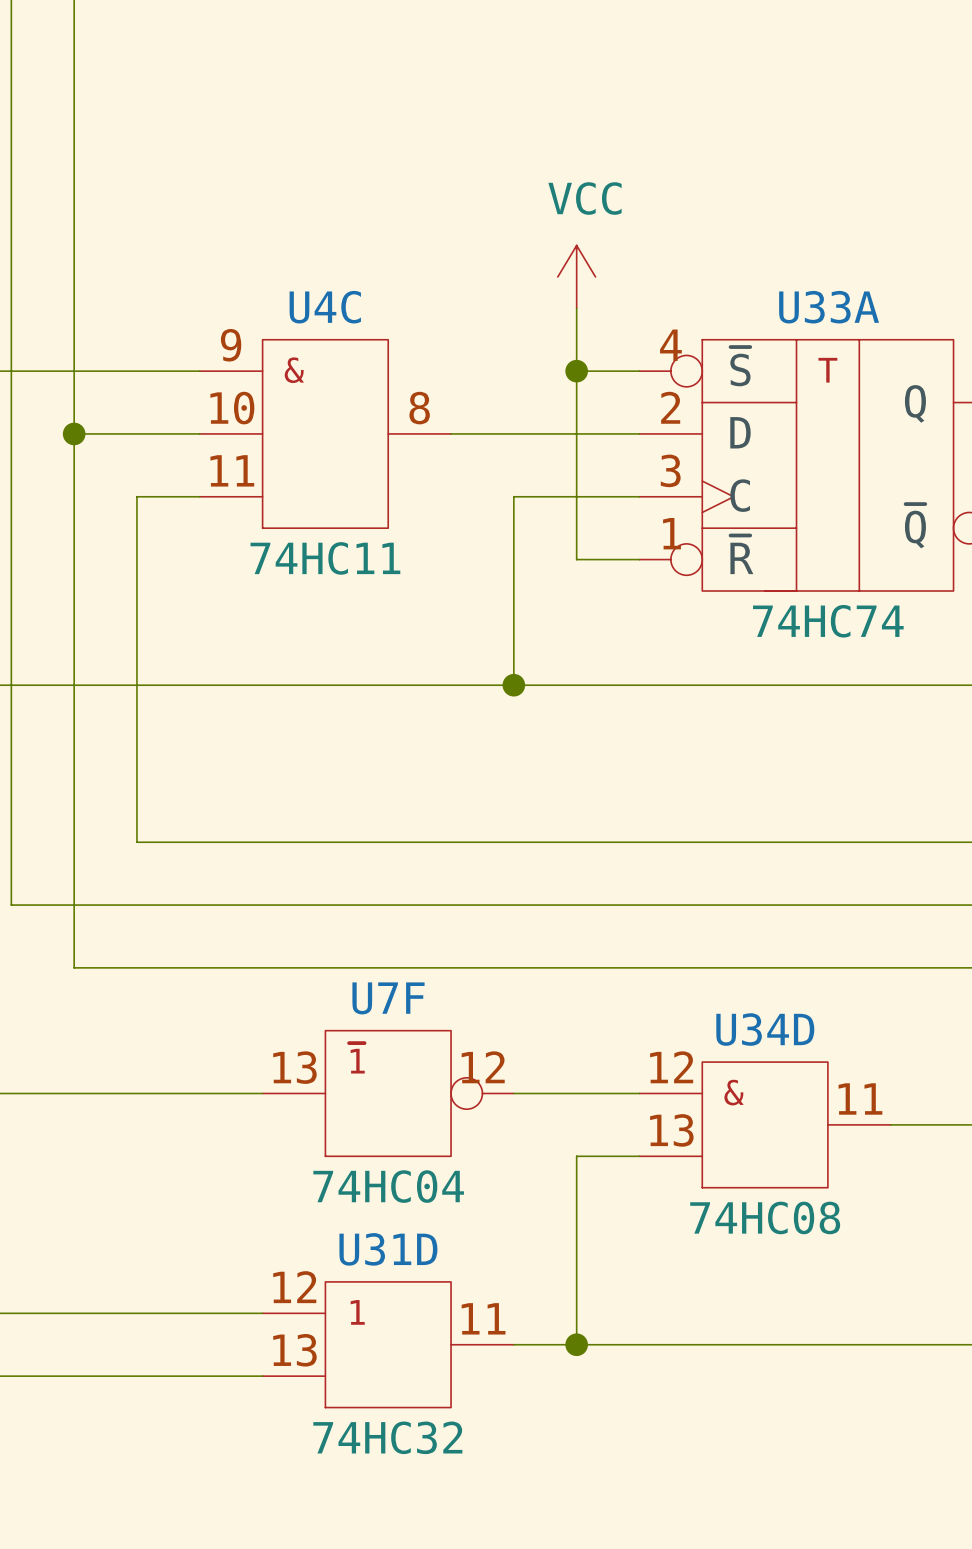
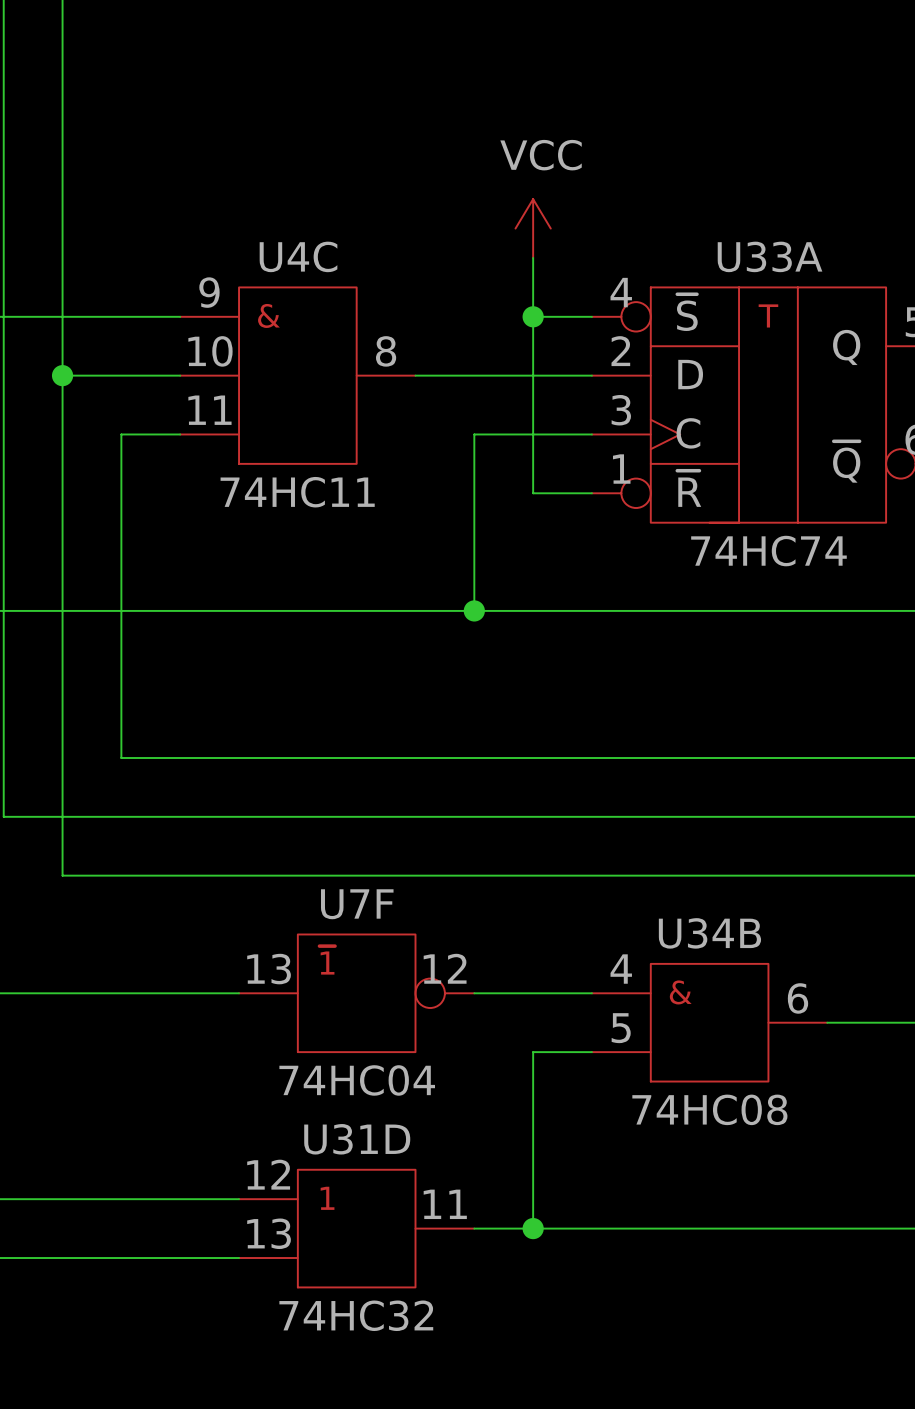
U34D name: U34D (765, 1029) -> U34B (709, 933)
U34D pin number: 12 (671, 1067) -> 4 (621, 969)
U34D pin number: 11 (860, 1098) -> 6 (798, 998)
U34D pin number: 13 (671, 1130) -> 5 (621, 1028)

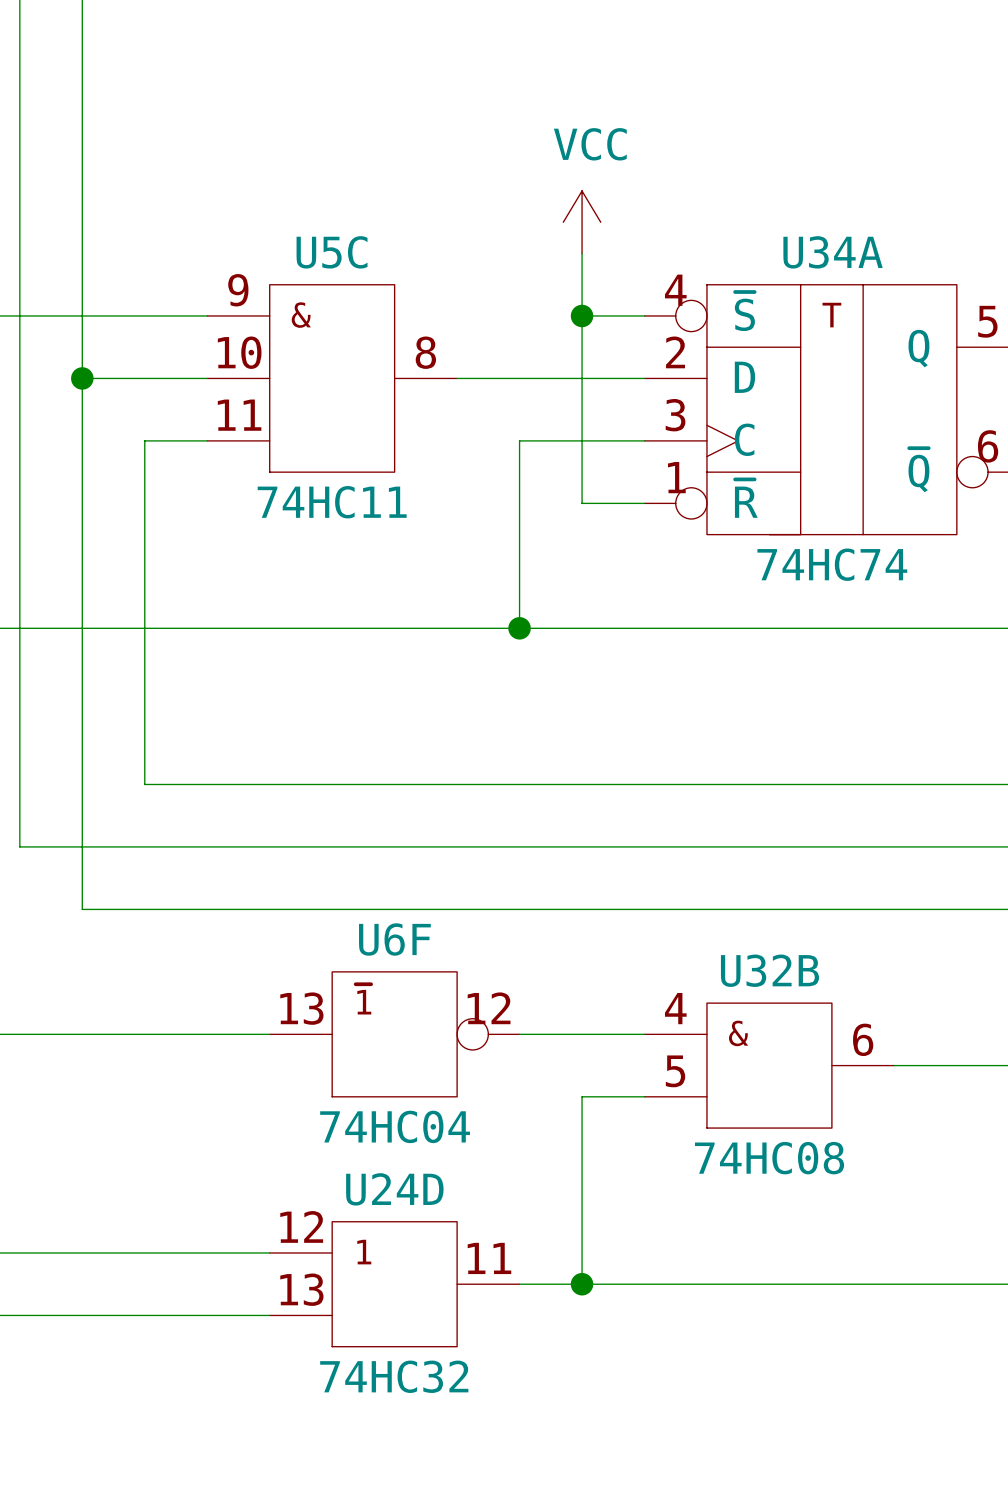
U4C name: U4C (298, 256) -> U5C (332, 252)
U33A name: U33A (770, 256) -> U34A (833, 252)
U7F name: U7F (357, 904) -> U6F (394, 939)
U34B name: U34B (709, 933) -> U32B (769, 970)
U31D name: U31D (357, 1139) -> U24D (394, 1189)

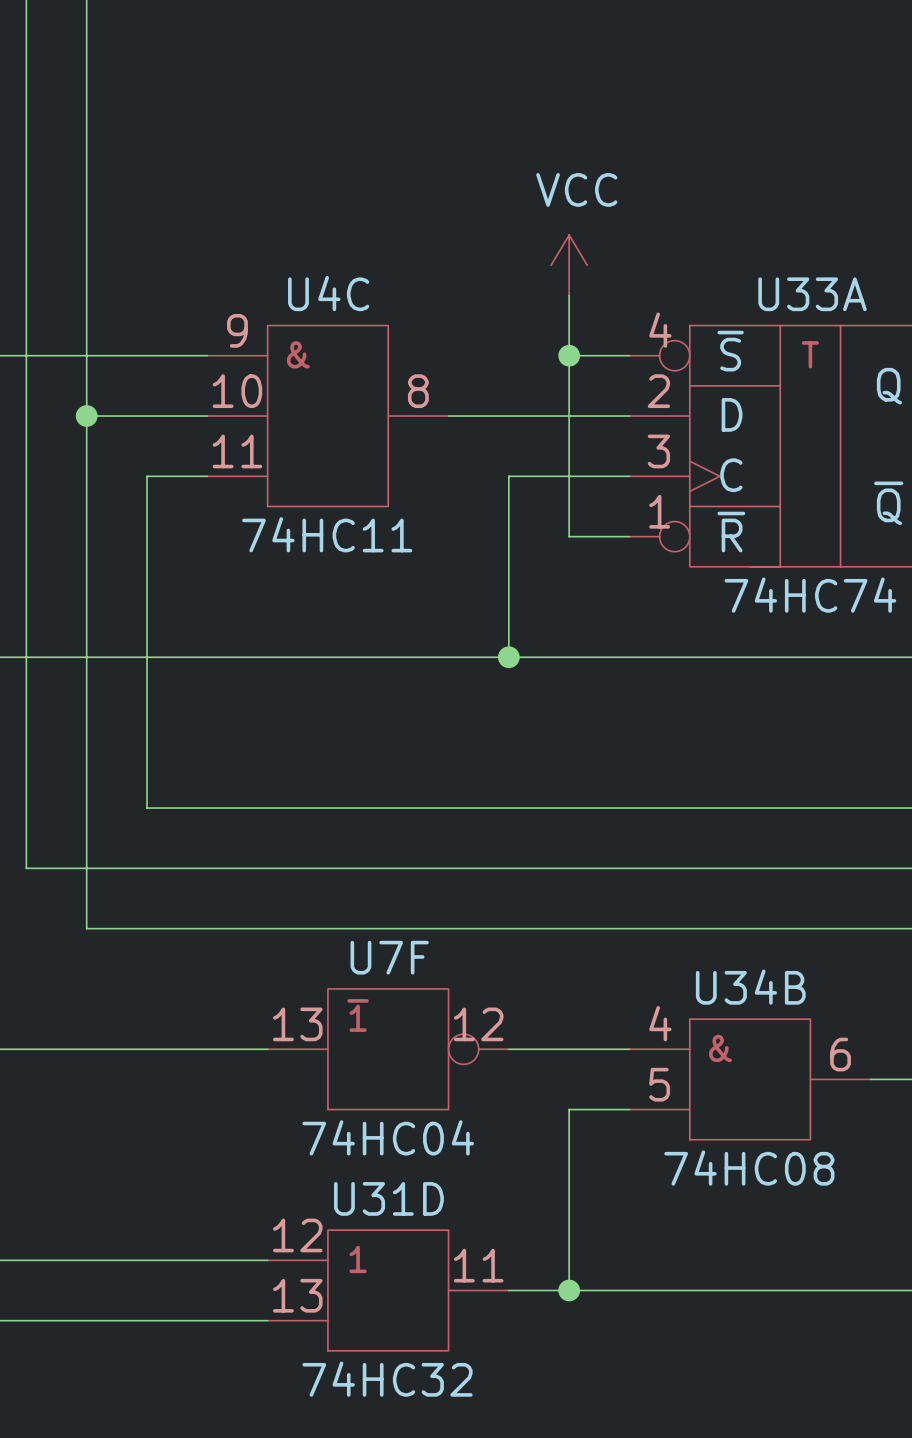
U5C name: U5C (332, 252) -> U4C (328, 293)
U34A name: U34A (833, 252) -> U33A (812, 294)
U6F name: U6F (394, 939) -> U7F (389, 957)
U32B name: U32B (769, 970) -> U34B (750, 987)
U24D name: U24D (394, 1189) -> U31D (388, 1198)

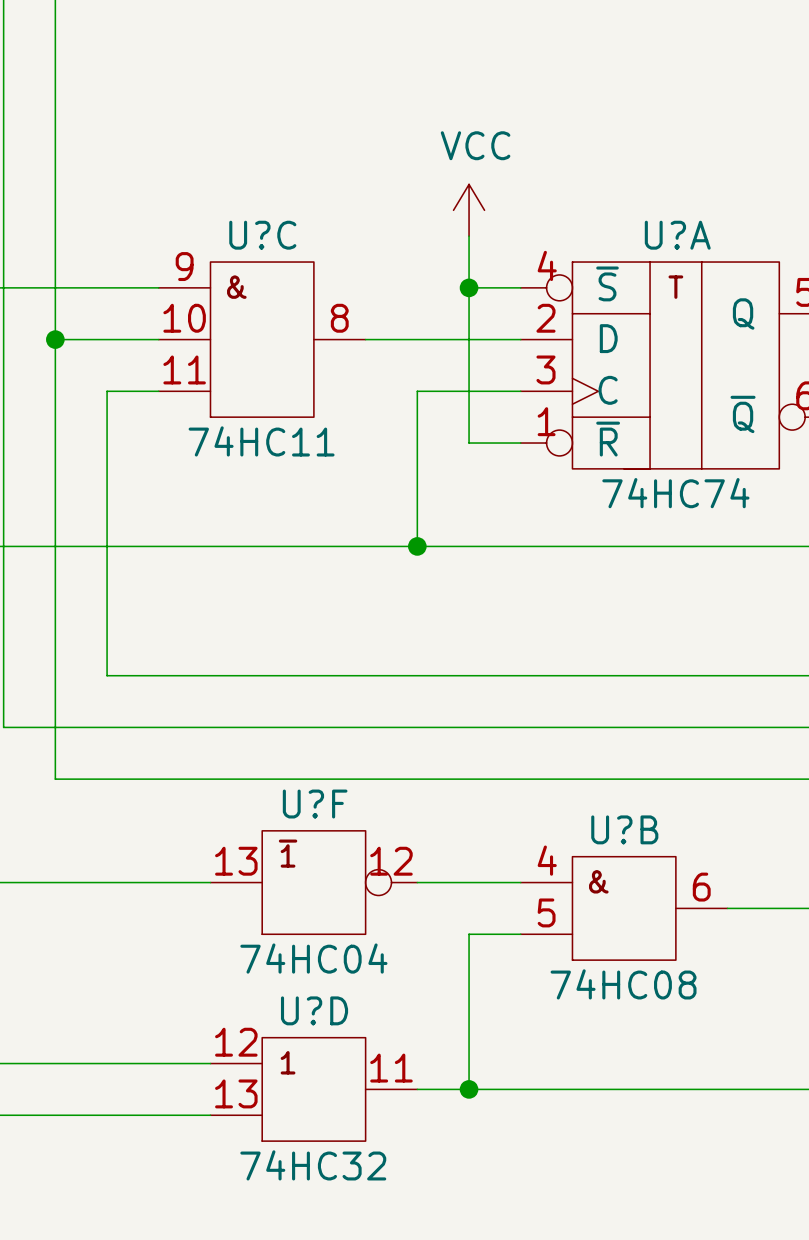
U4C name: U4C (328, 293) -> U?C (262, 235)
U33A name: U33A (812, 294) -> U?A (677, 235)
U7F name: U7F (389, 957) -> U?F (315, 804)
U34B name: U34B (750, 987) -> U?B (624, 829)
U31D name: U31D (388, 1198) -> U?D (314, 1010)

